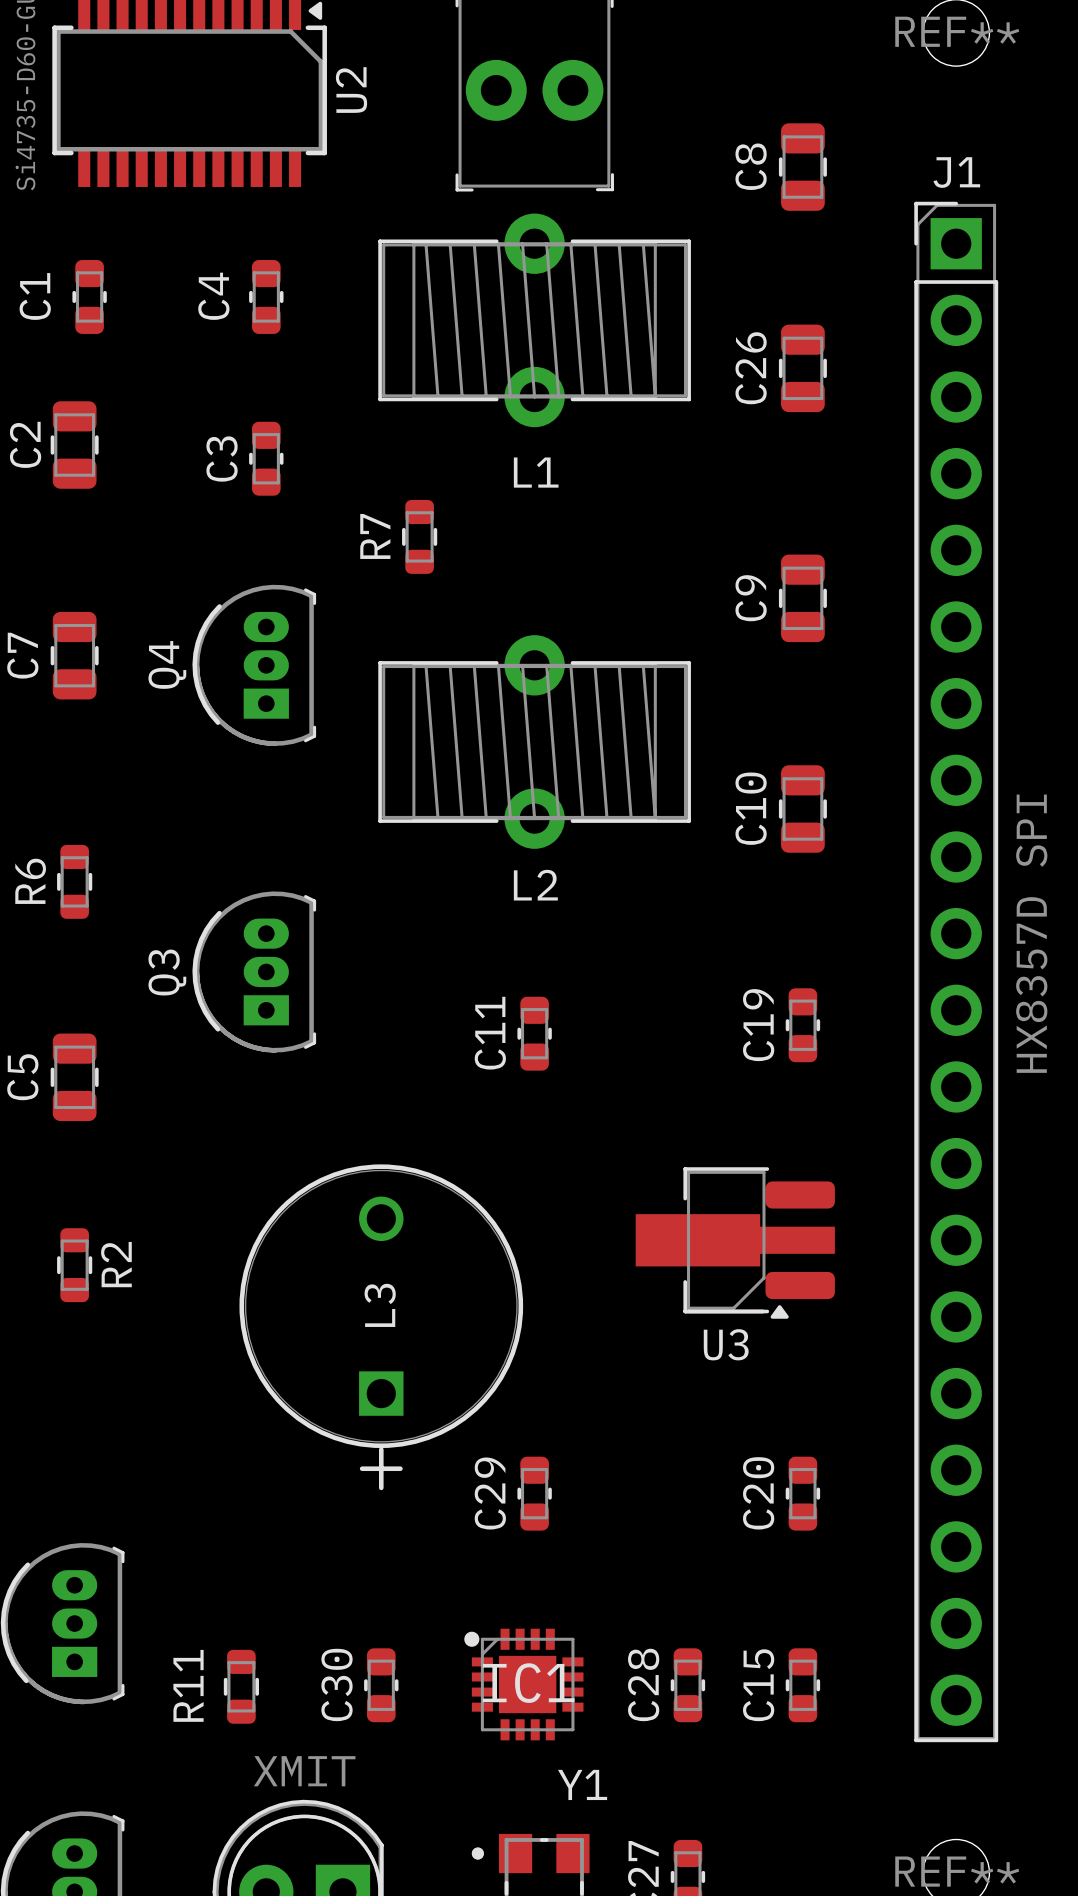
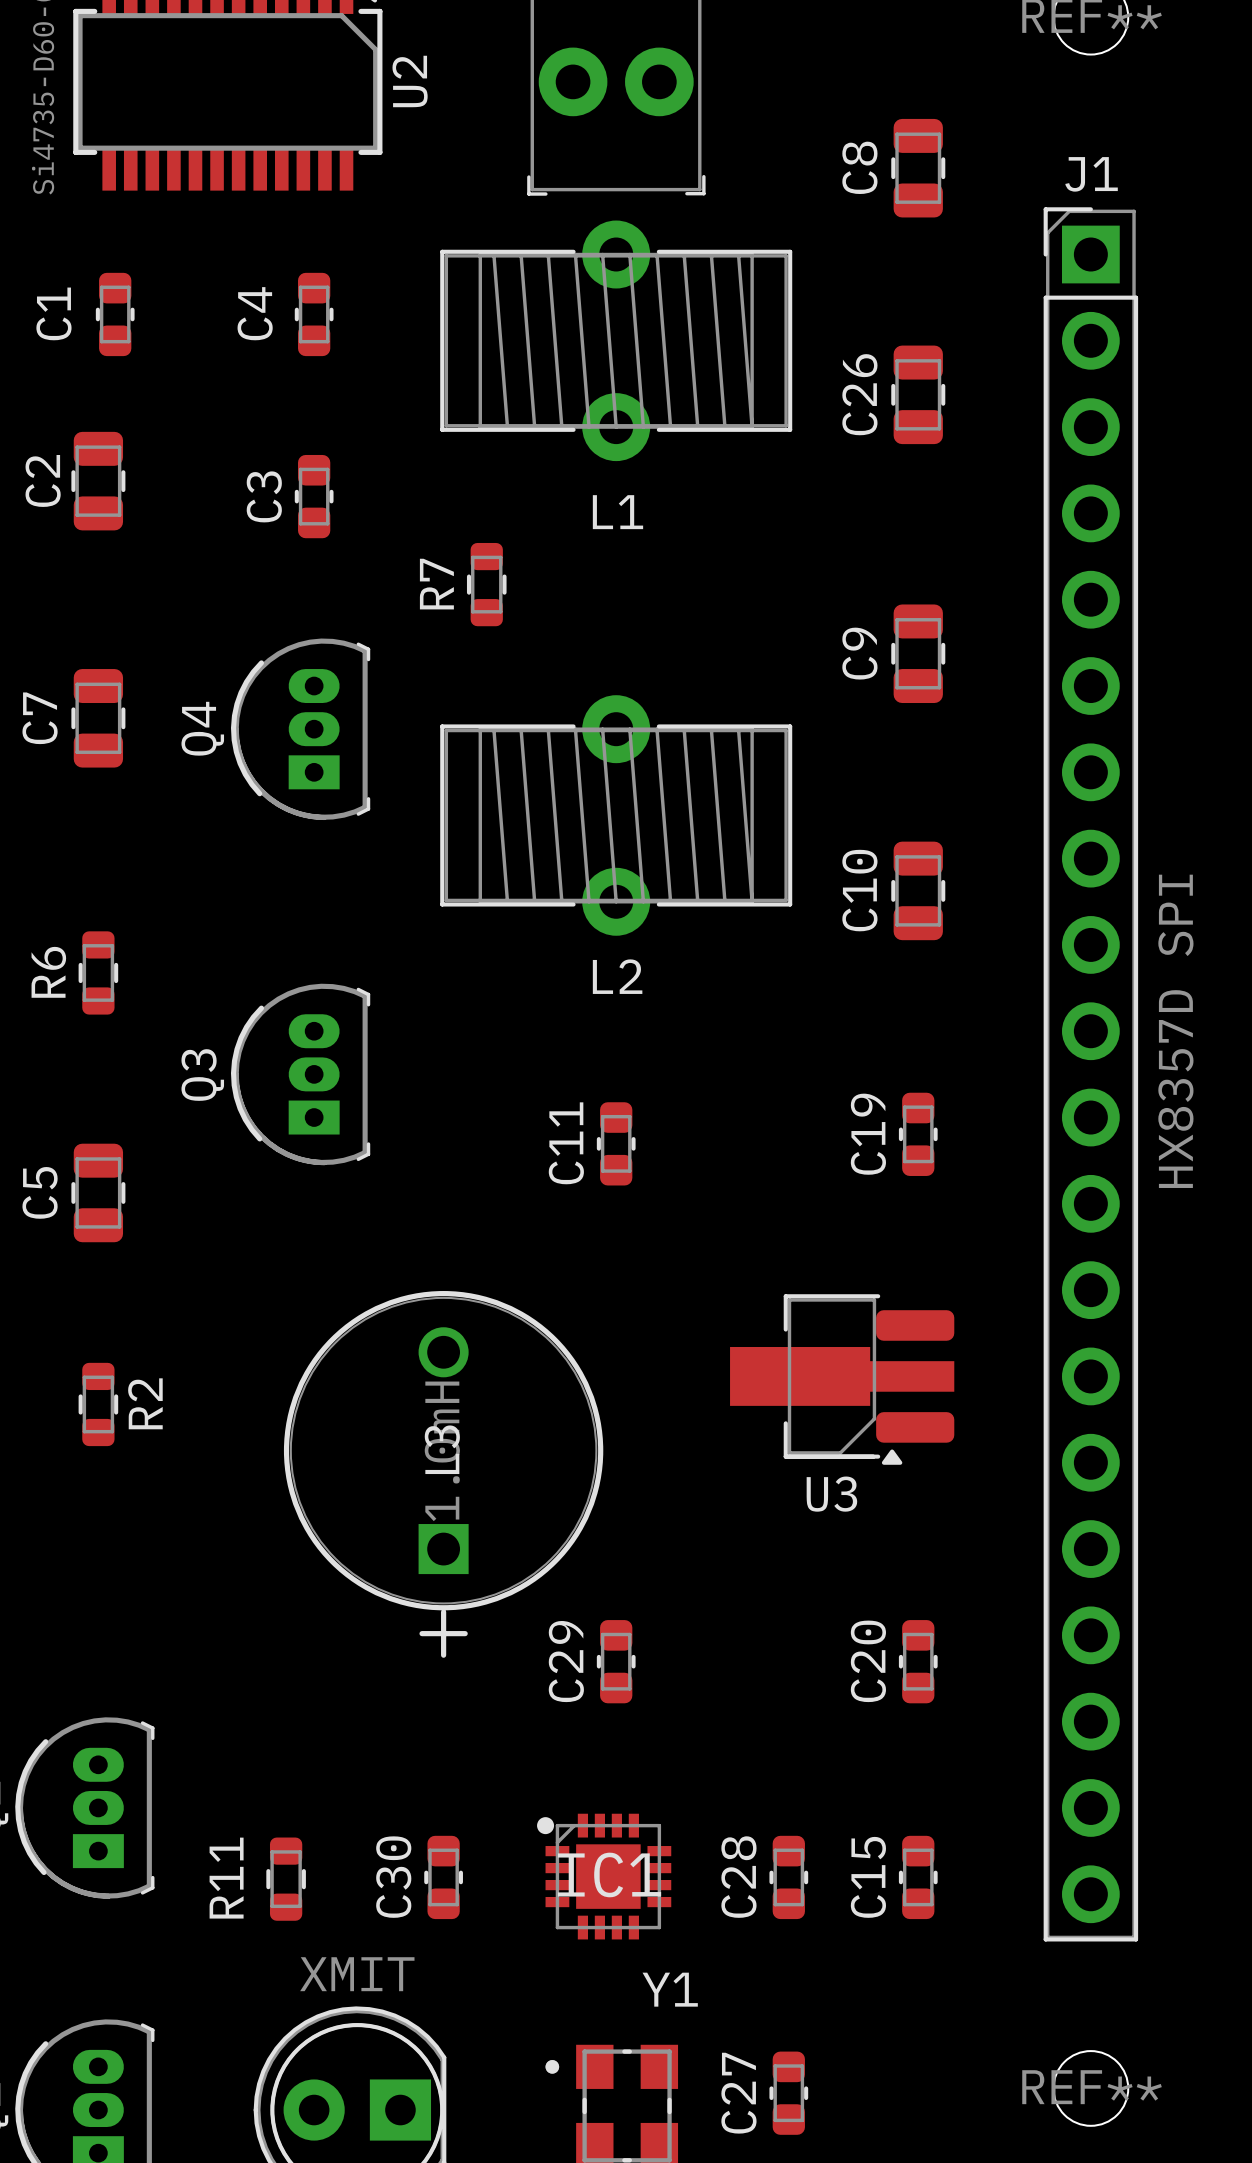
L3 value: none -> 1.0mH (442, 1451)

